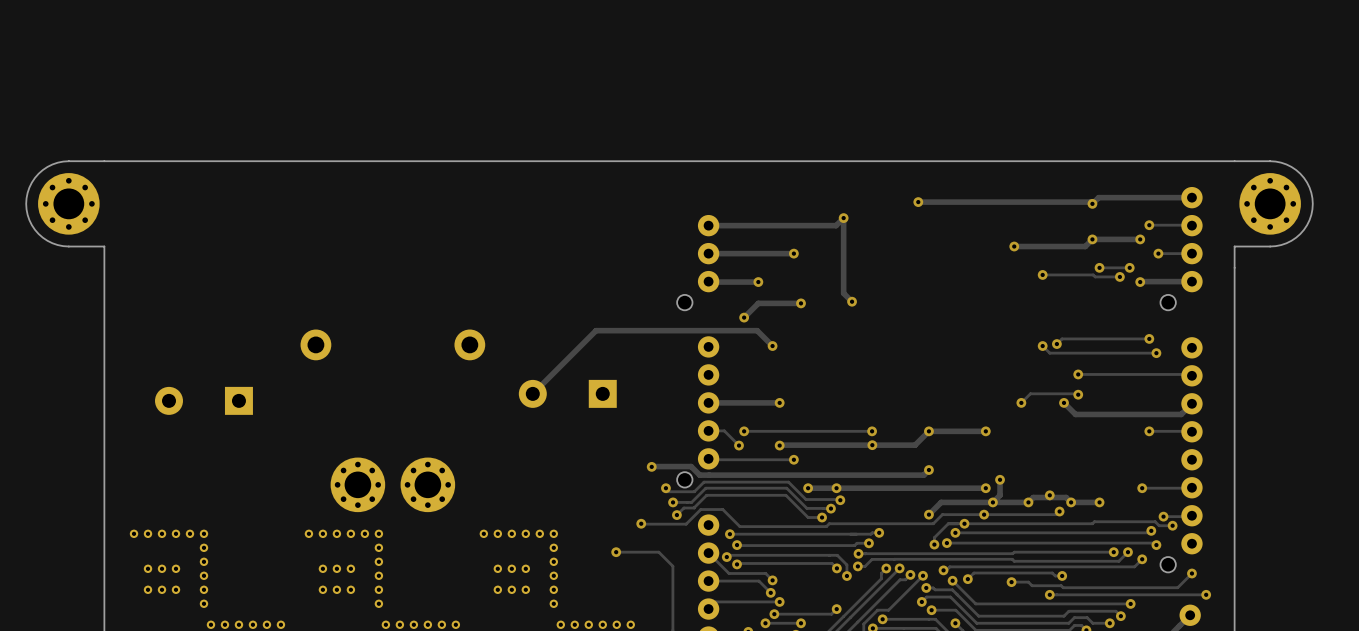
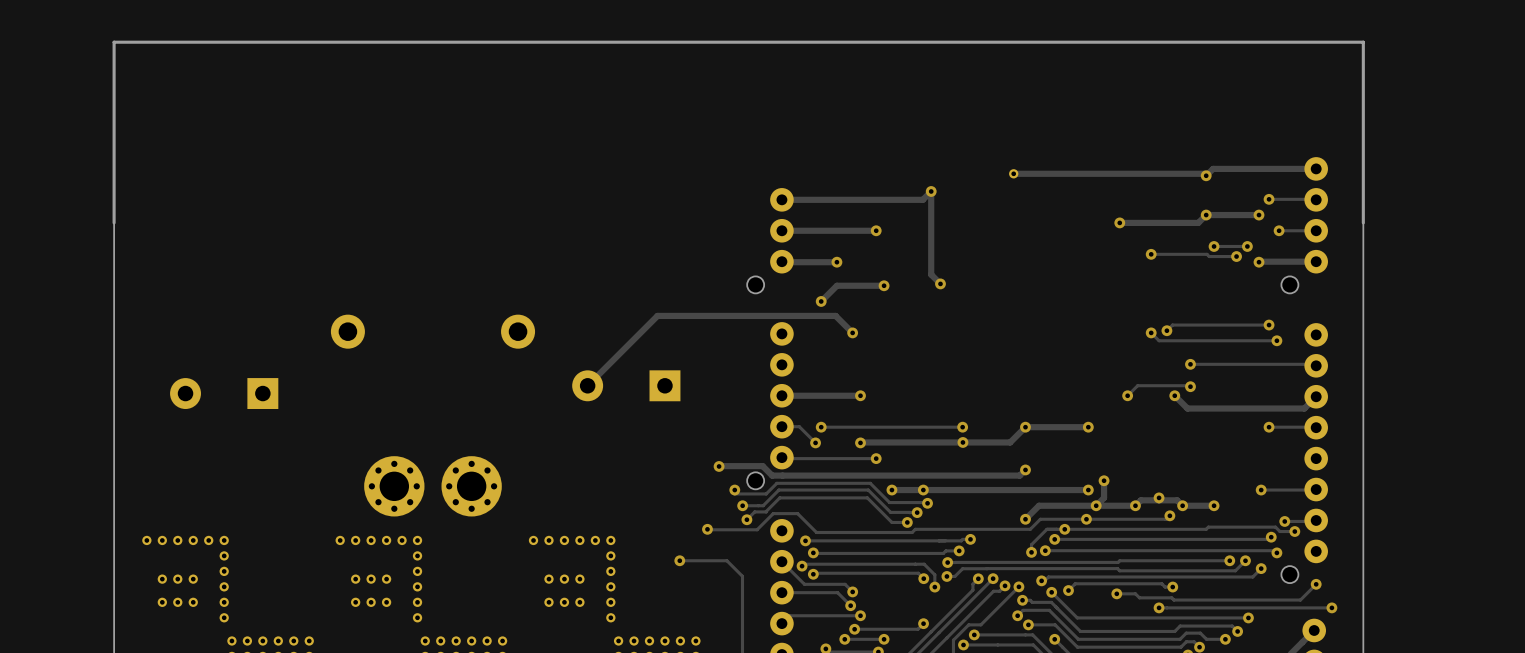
part: none -> (1013, 173)
via: (918, 202) -> none
part: (68, 203) -> none
part: (1270, 203) -> none
board edge: (1234, 246) (1281, 245) (1291, 240) (1303, 229) (1311, 214) (1312, 198) (1307, 182) (1296, 170) (1281, 162) (1270, 161) (68, 161) (57, 162) (42, 170) (31, 182) (26, 198) (27, 214) (35, 229) (47, 240) (57, 245) (104, 246) -> (1363, 222) (1363, 42) (114, 42) (114, 222)

